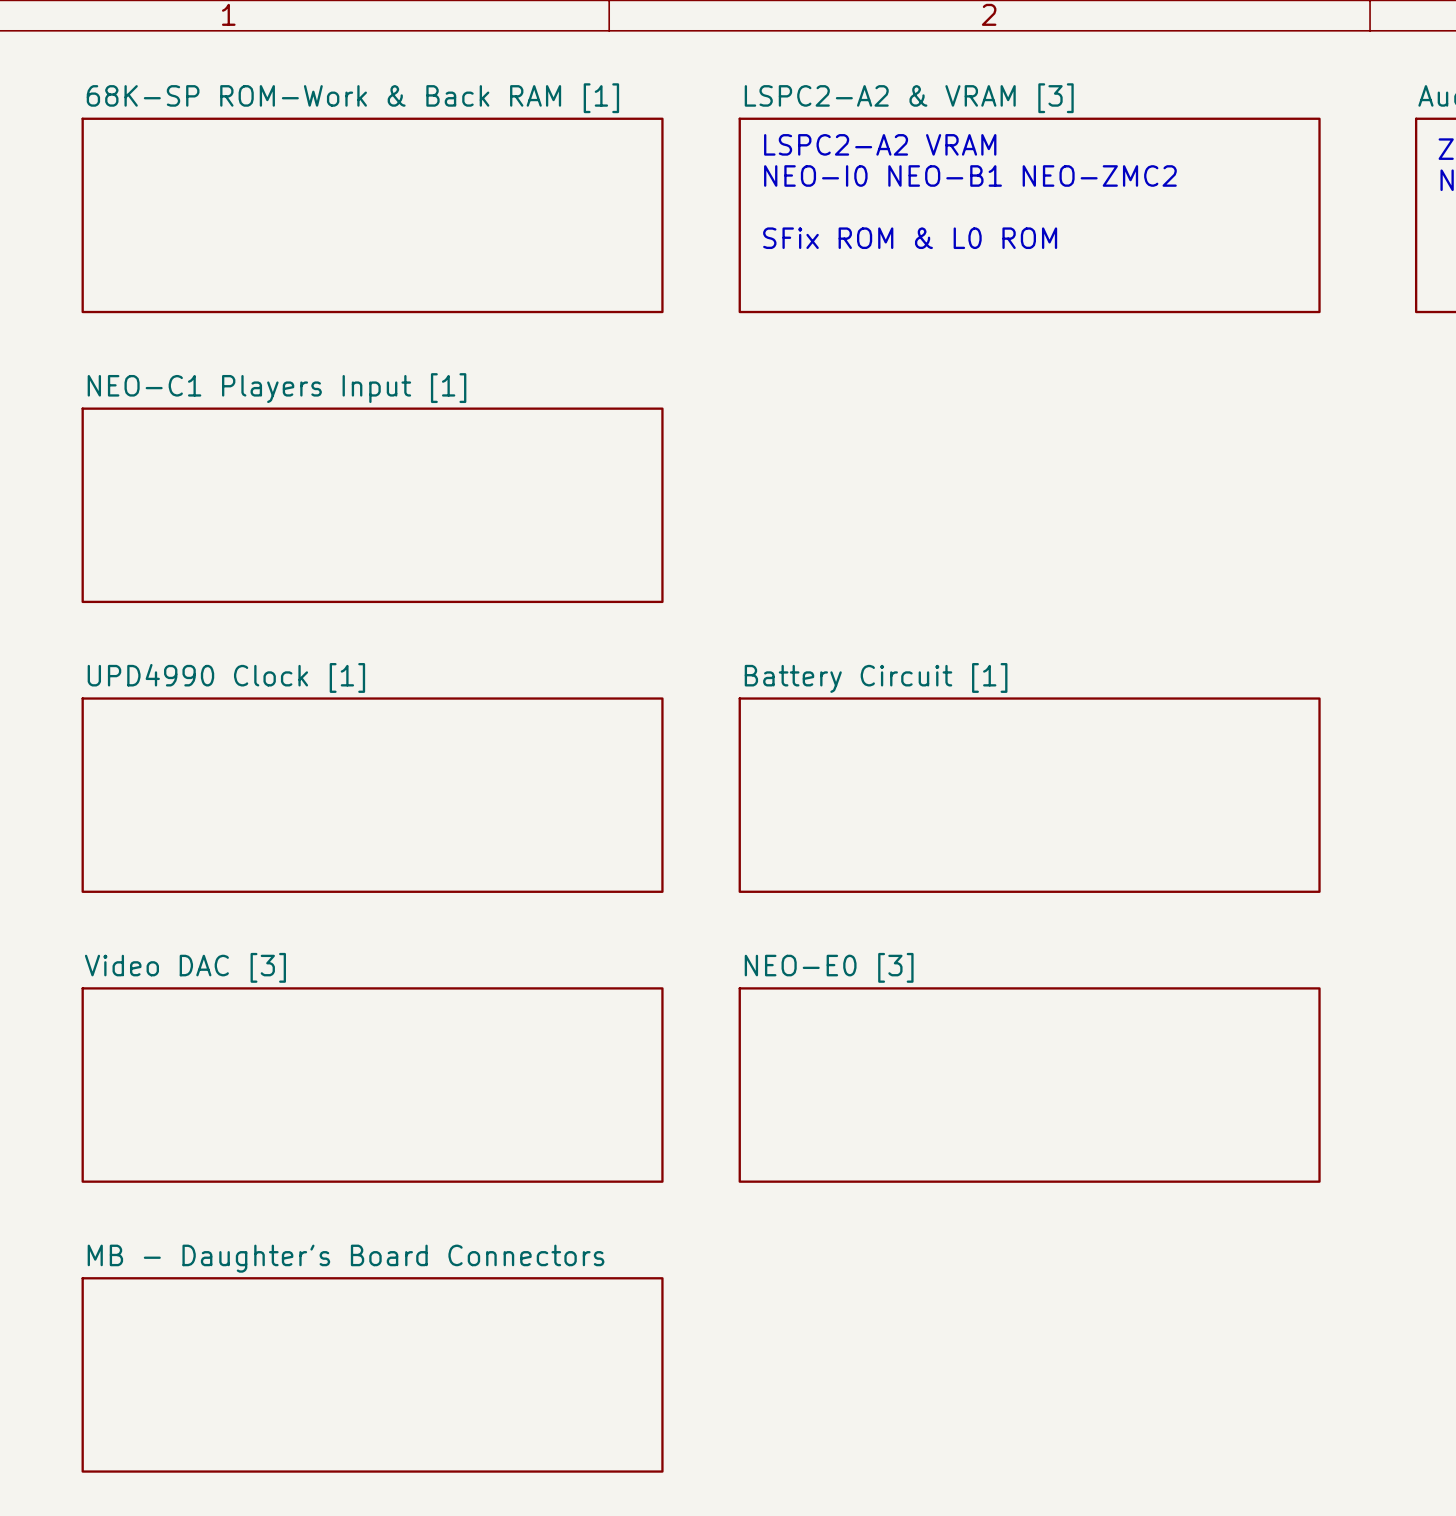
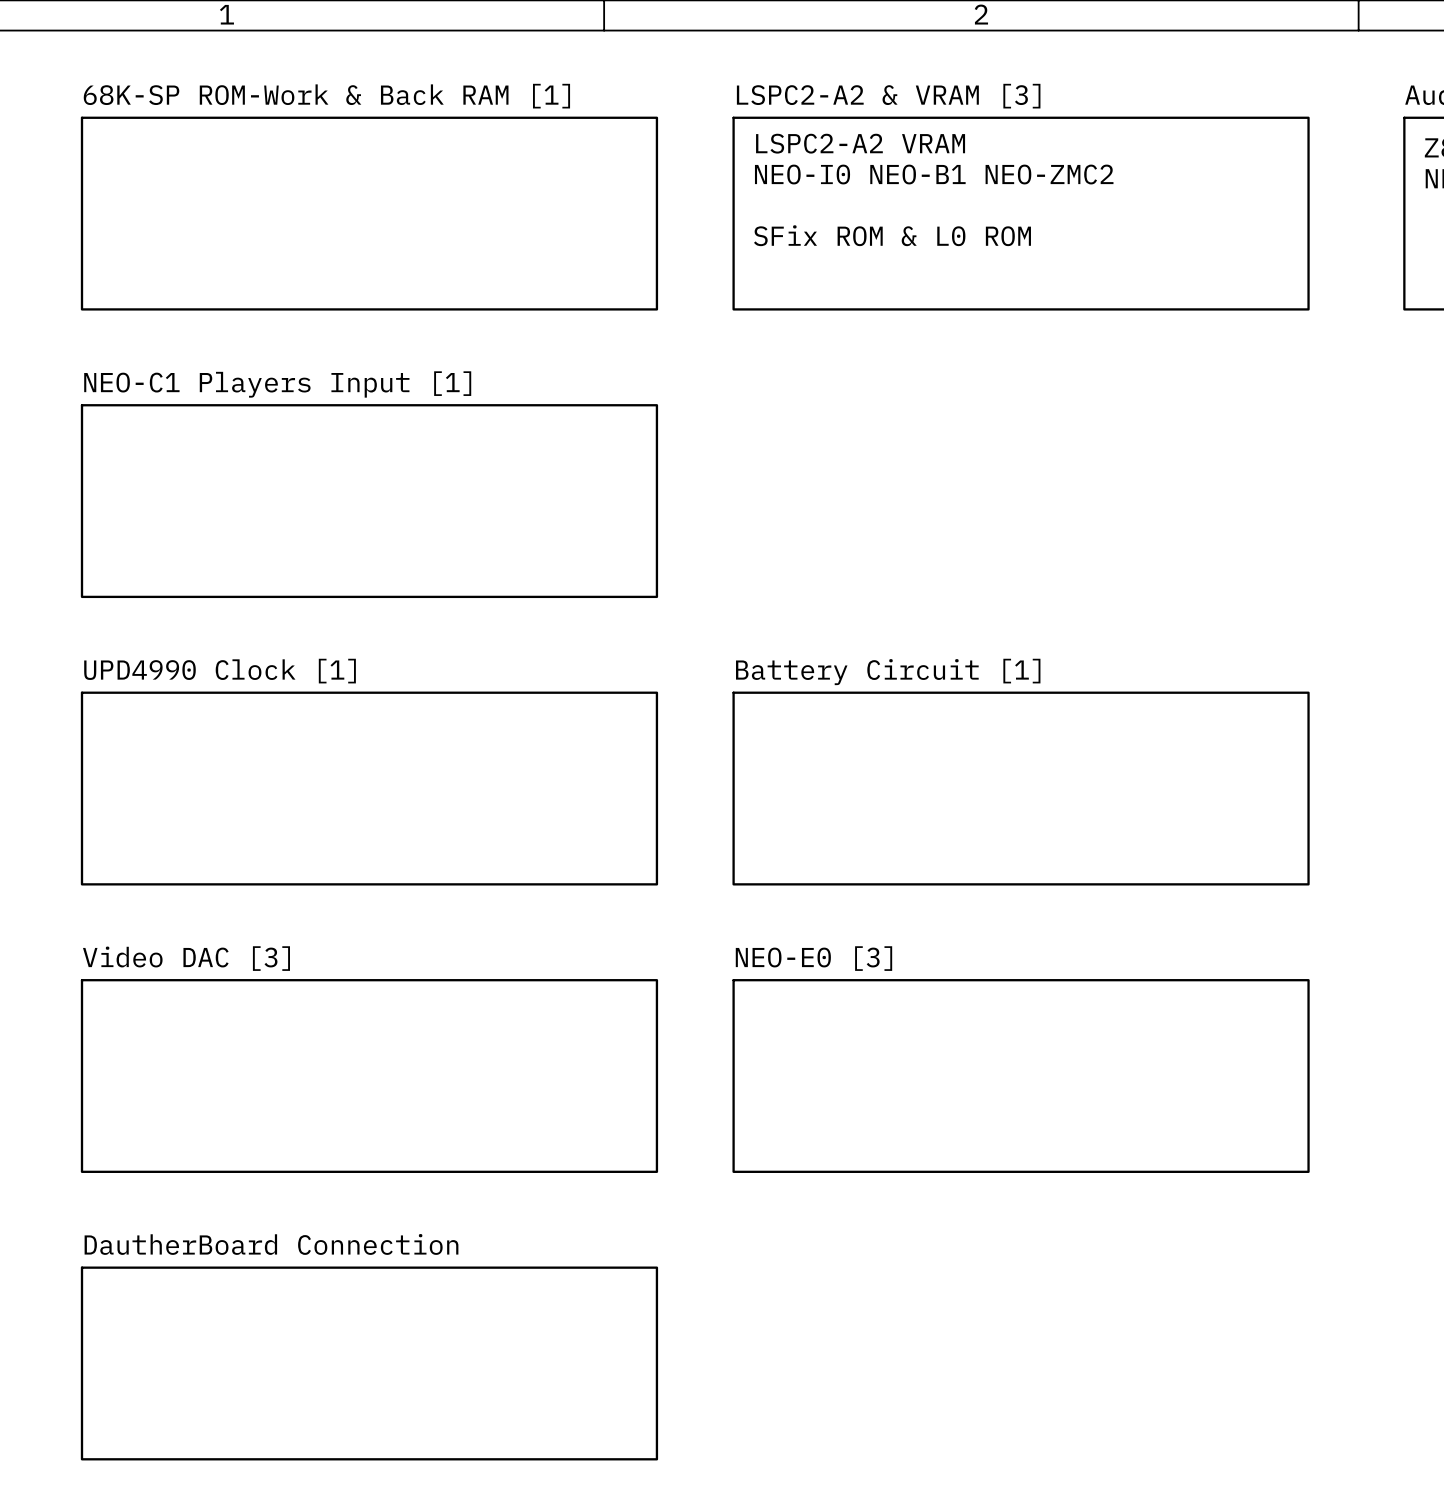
sheet MB - Daughter's Board Connectors name: MB - Daughter's Board Connectors (346, 1258) -> DautherBoard Connection (271, 1244)

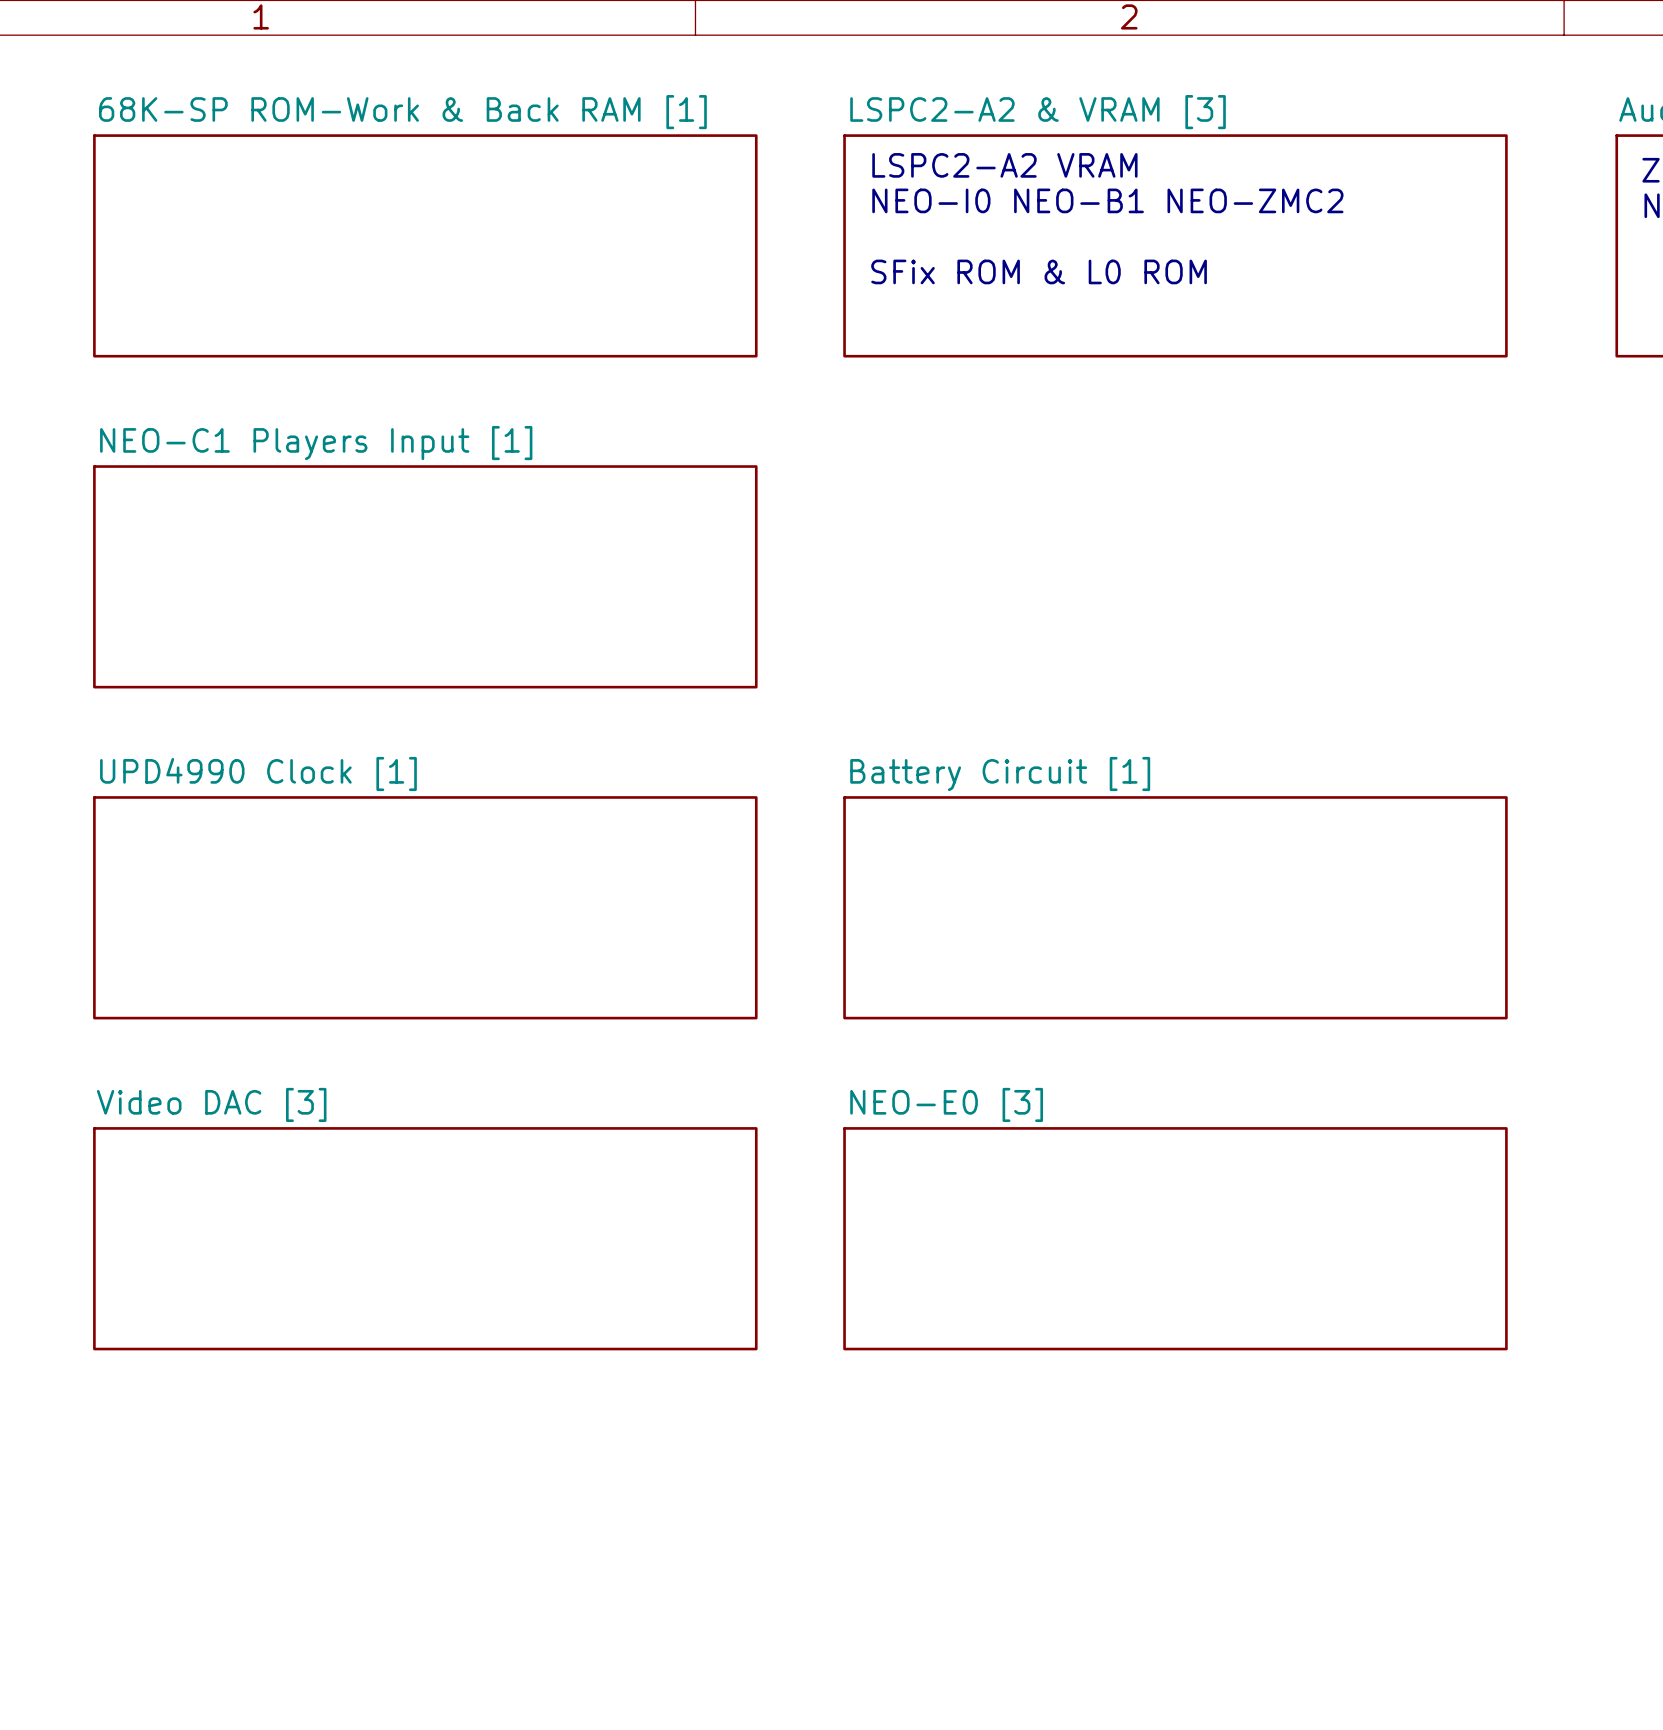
sheet DautherBoard Connection: (369, 1363) -> none

